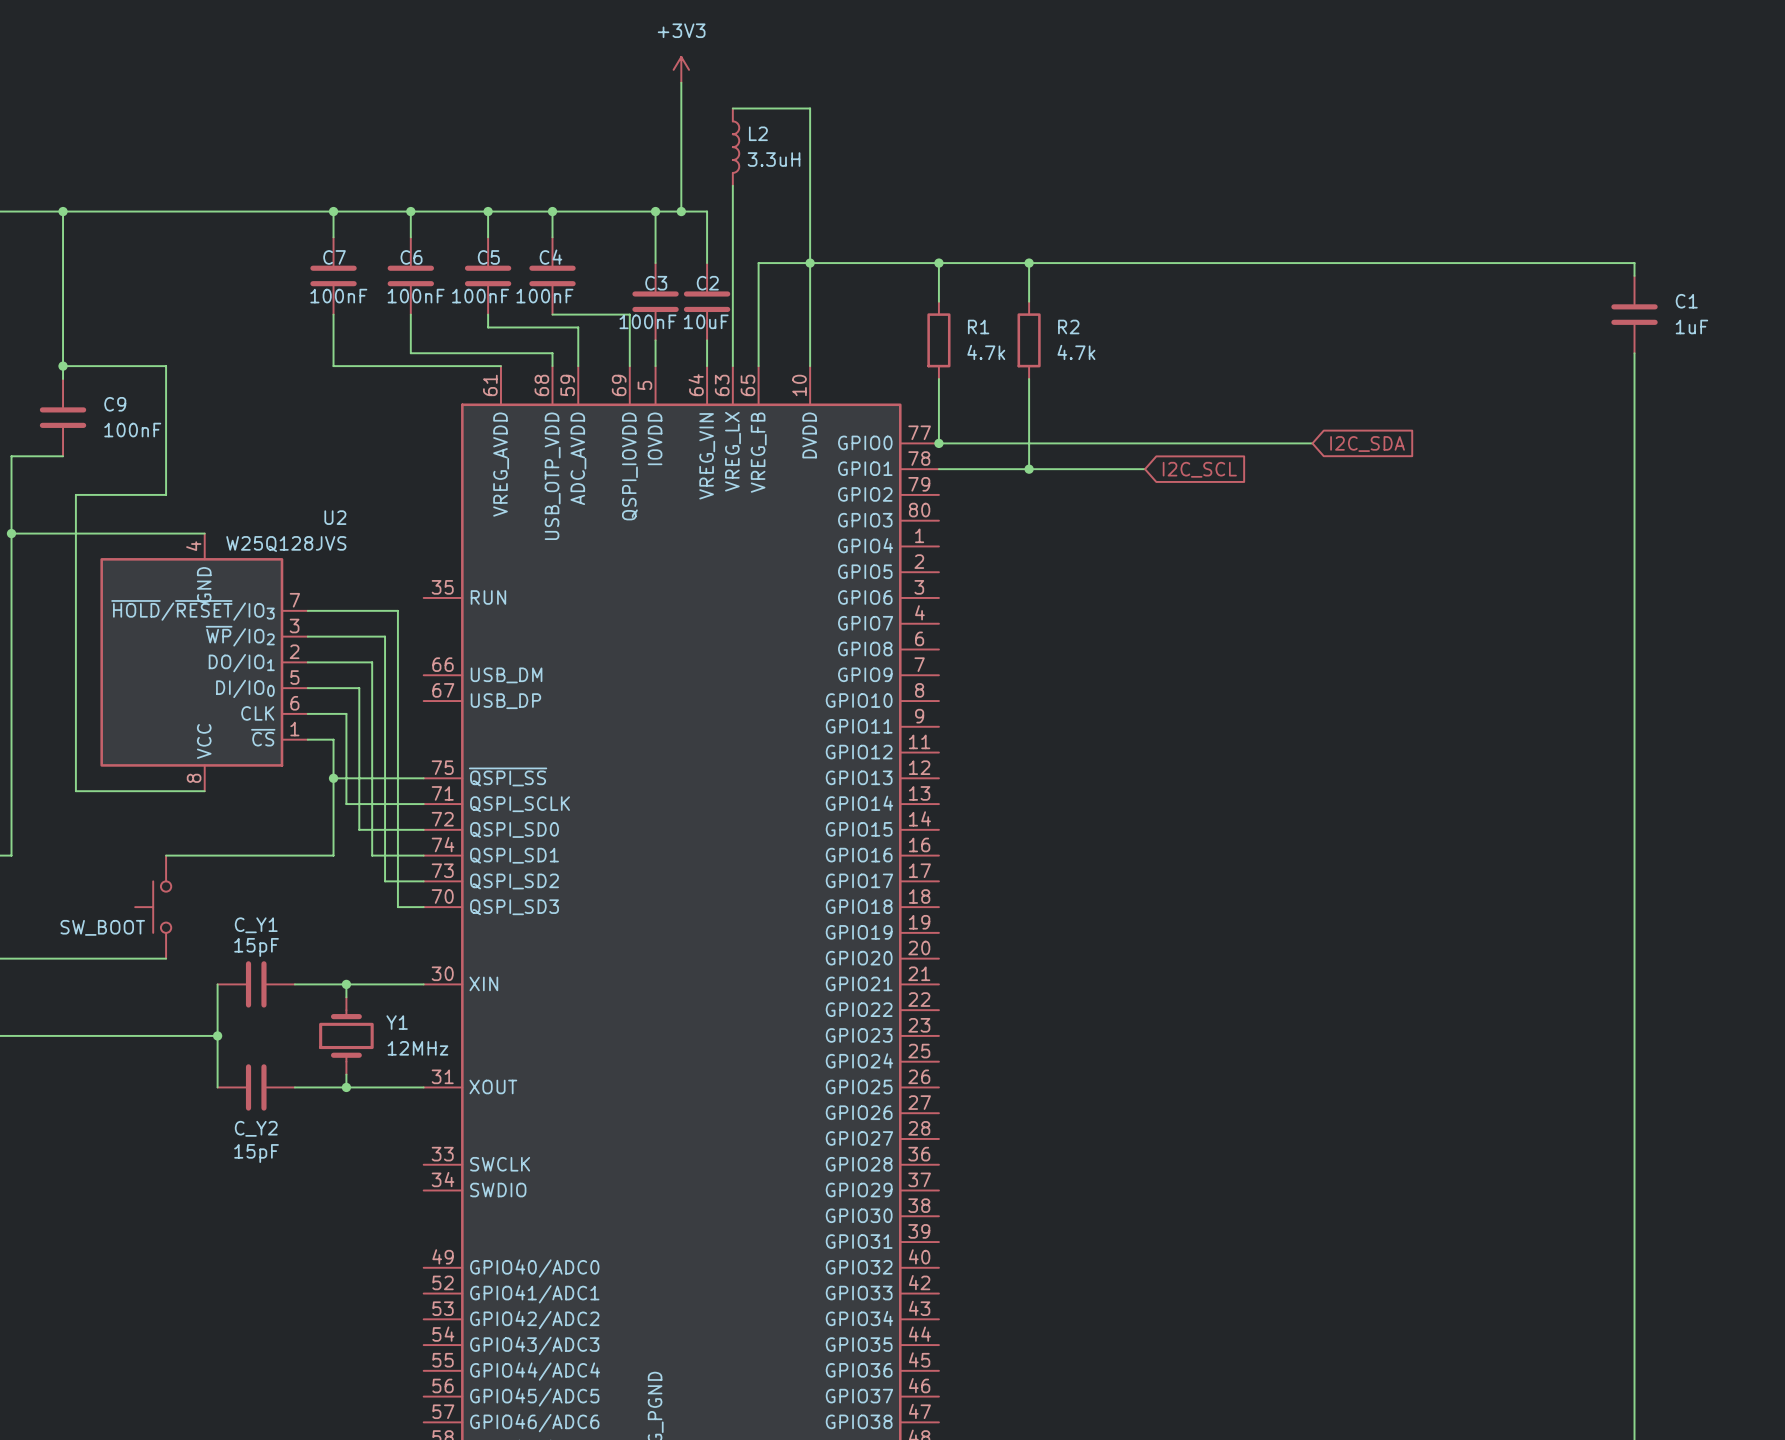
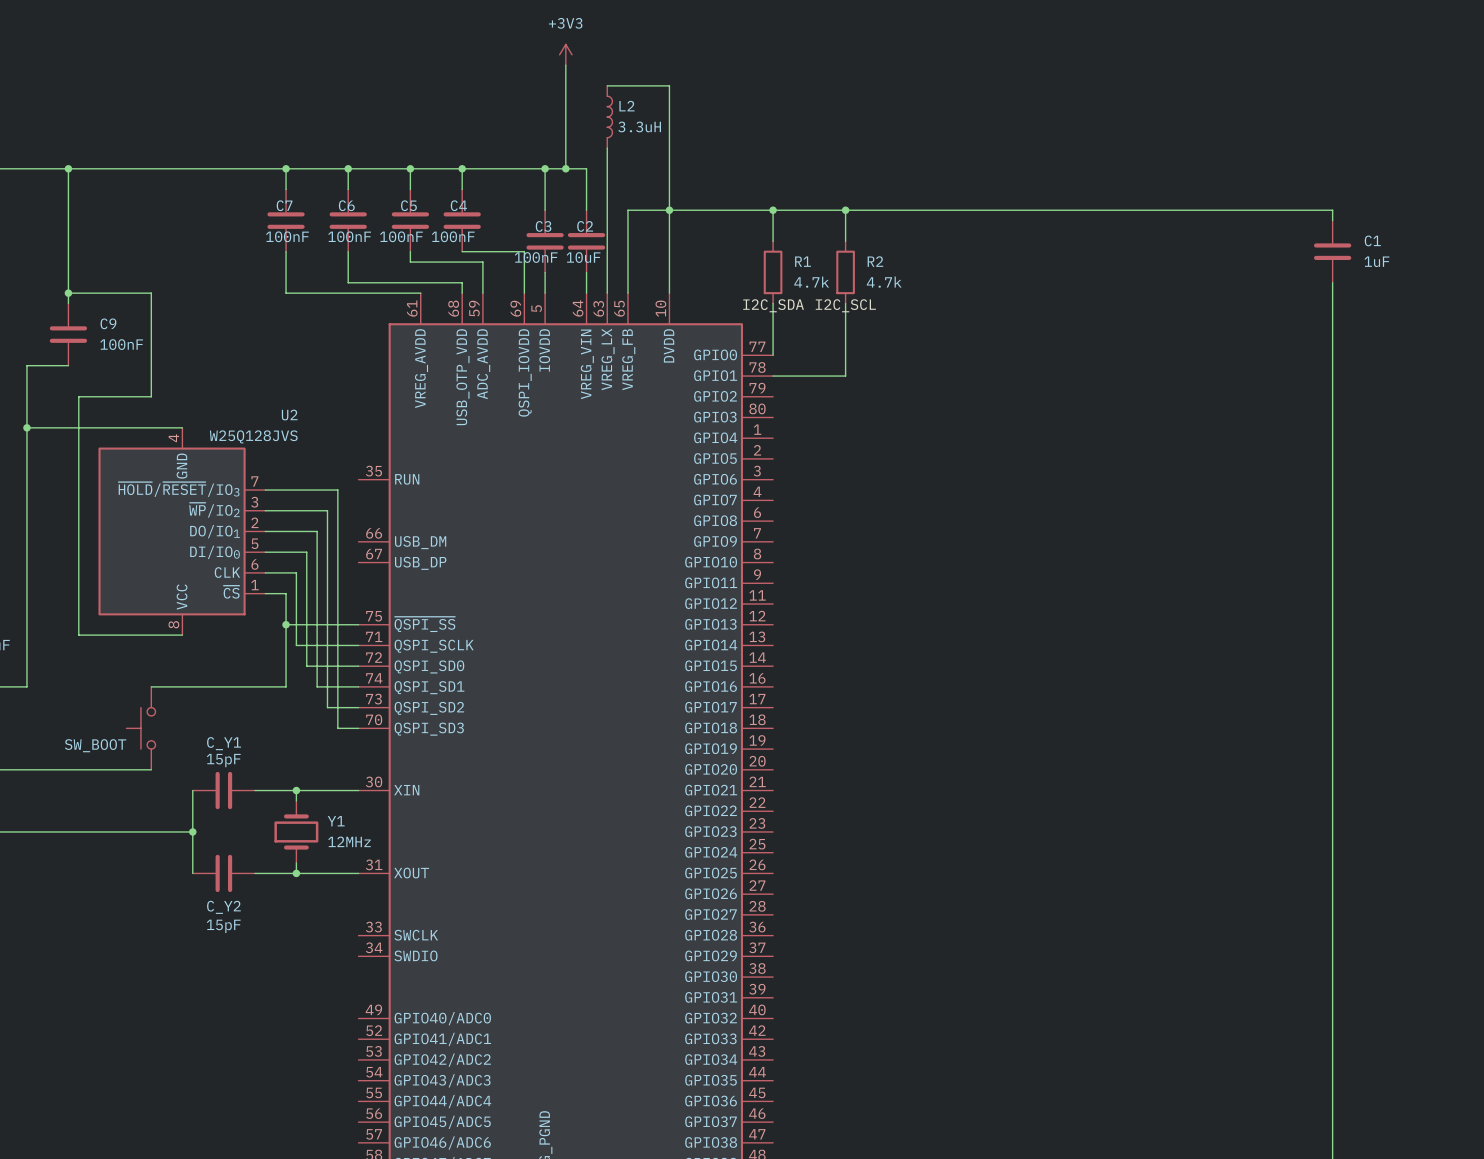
label: none -> I2C_SDA (773, 305)
label: none -> I2C_SCL (845, 305)
wire: (938, 443) (1312, 443) -> none
junction: (938, 443) -> none
global label: I2C_SDA (1367, 444) -> none
wire: (1029, 469) (1145, 469) -> none
junction: (1029, 469) -> none
global label: I2C_SCL (1199, 469) -> none

